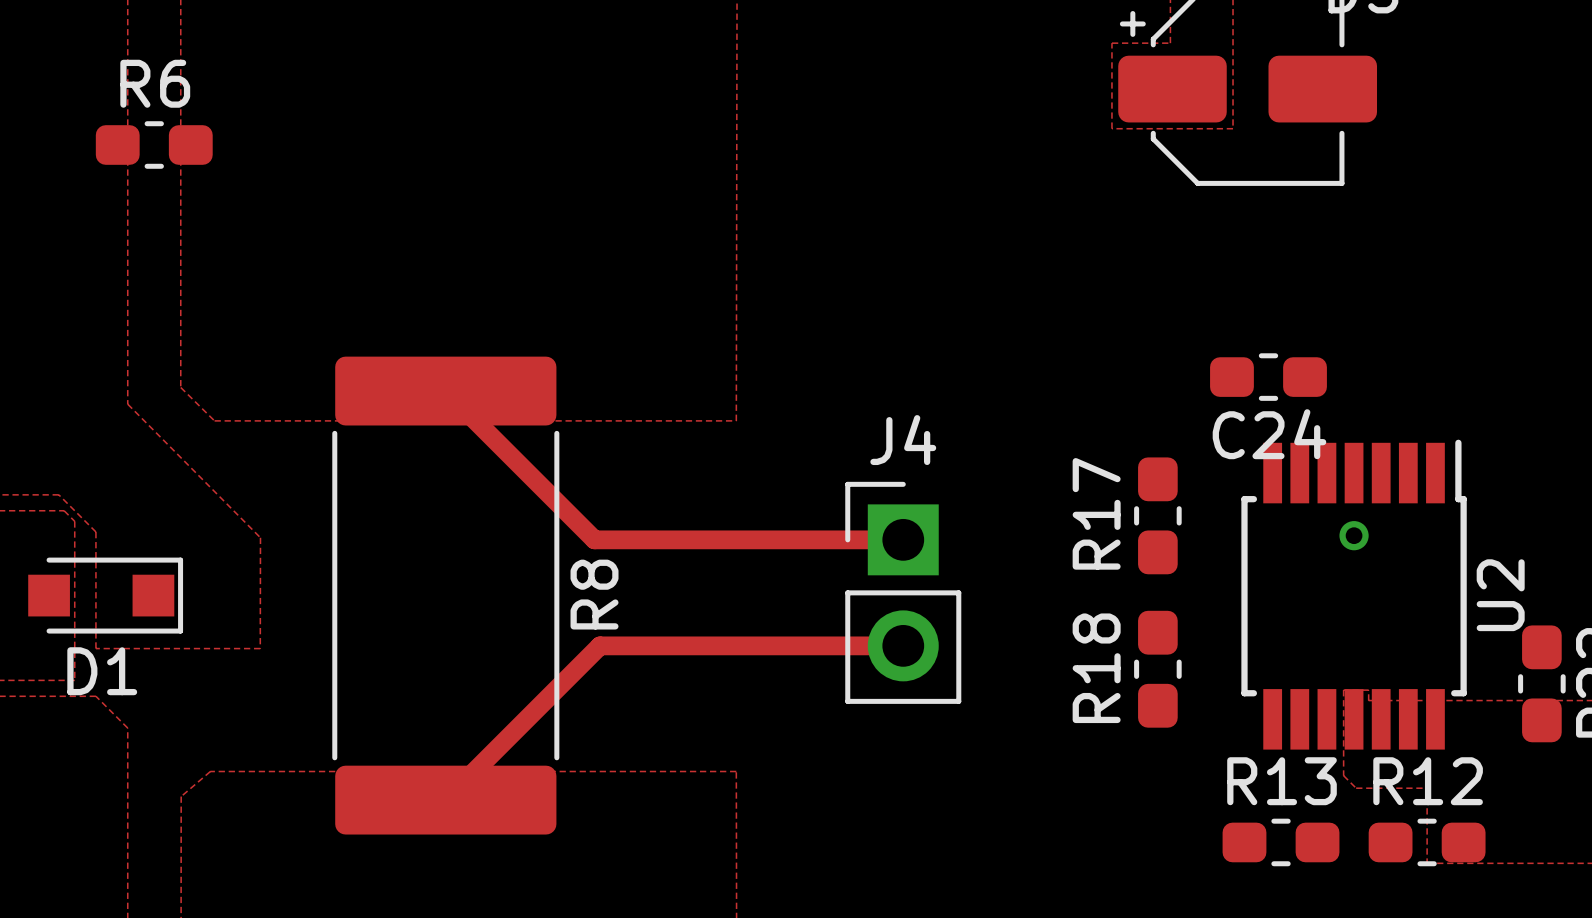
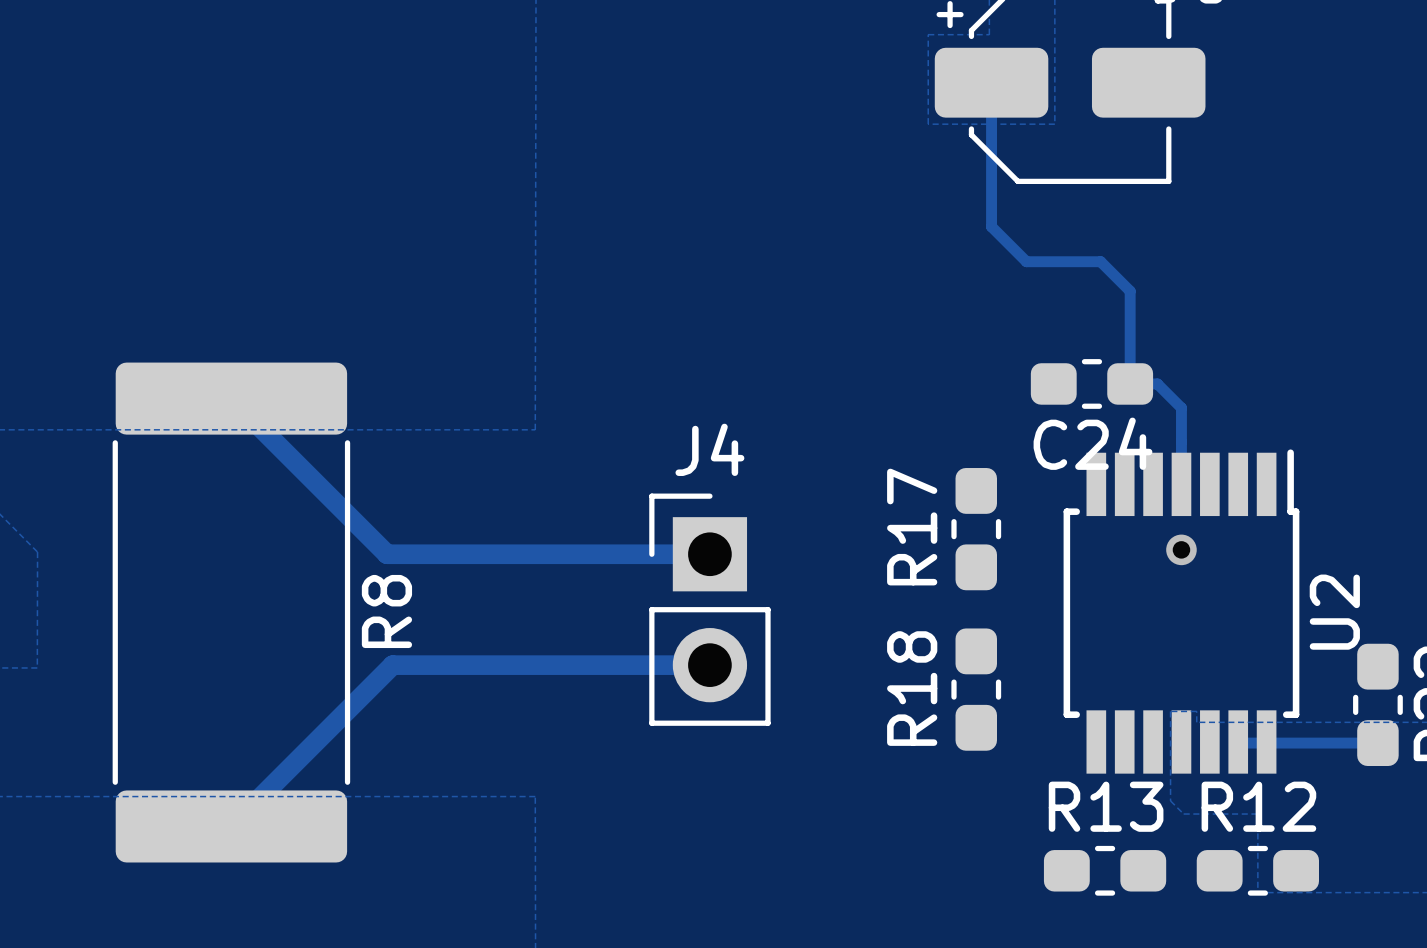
track: none -> (991, 82) (991, 226) (1026, 261) (1100, 261) (1130, 291) (1130, 383) (1157, 383) (1181, 407) (1181, 484)
track: none -> (1238, 741) (1377, 743)

